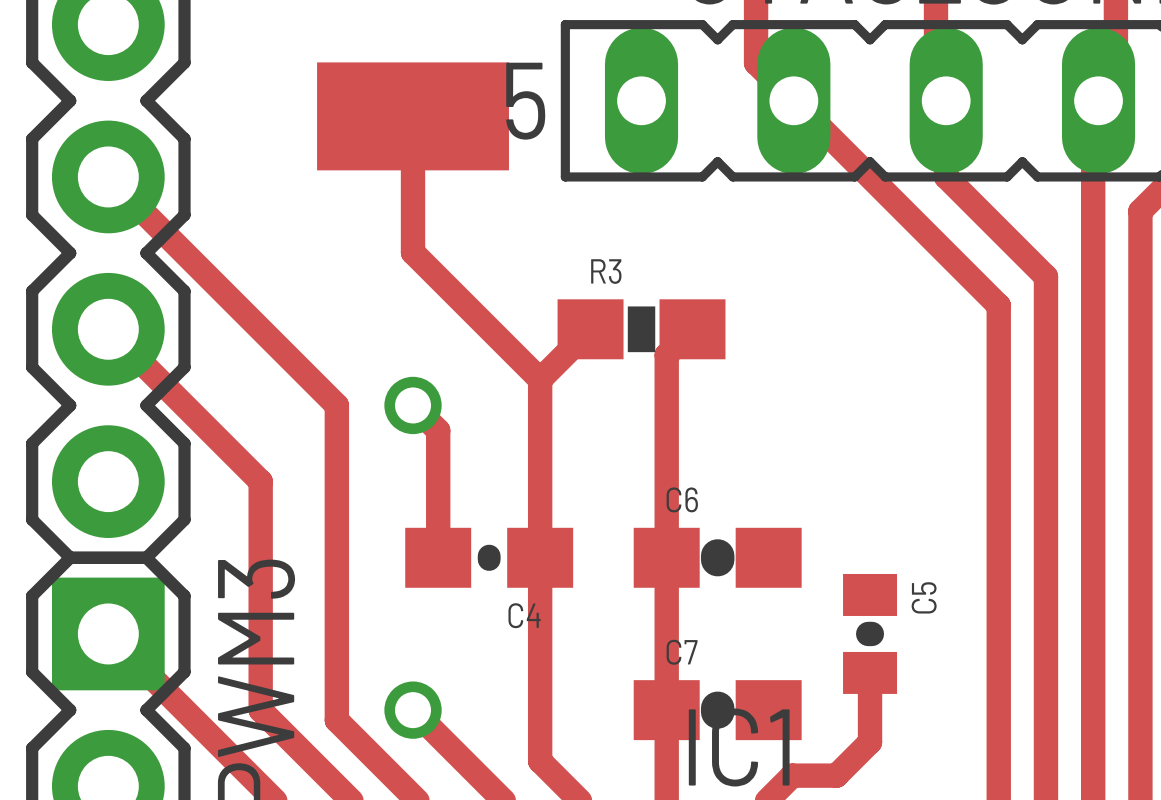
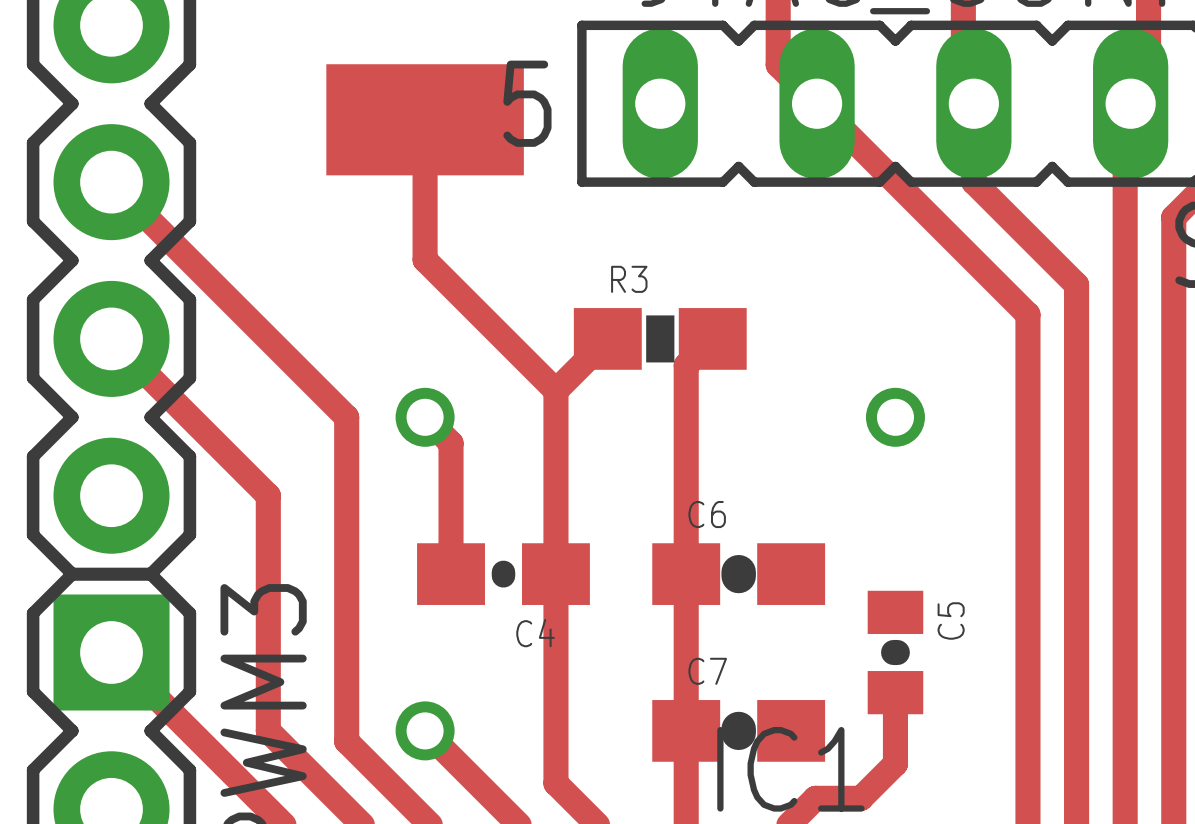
via: none -> (895, 417)

